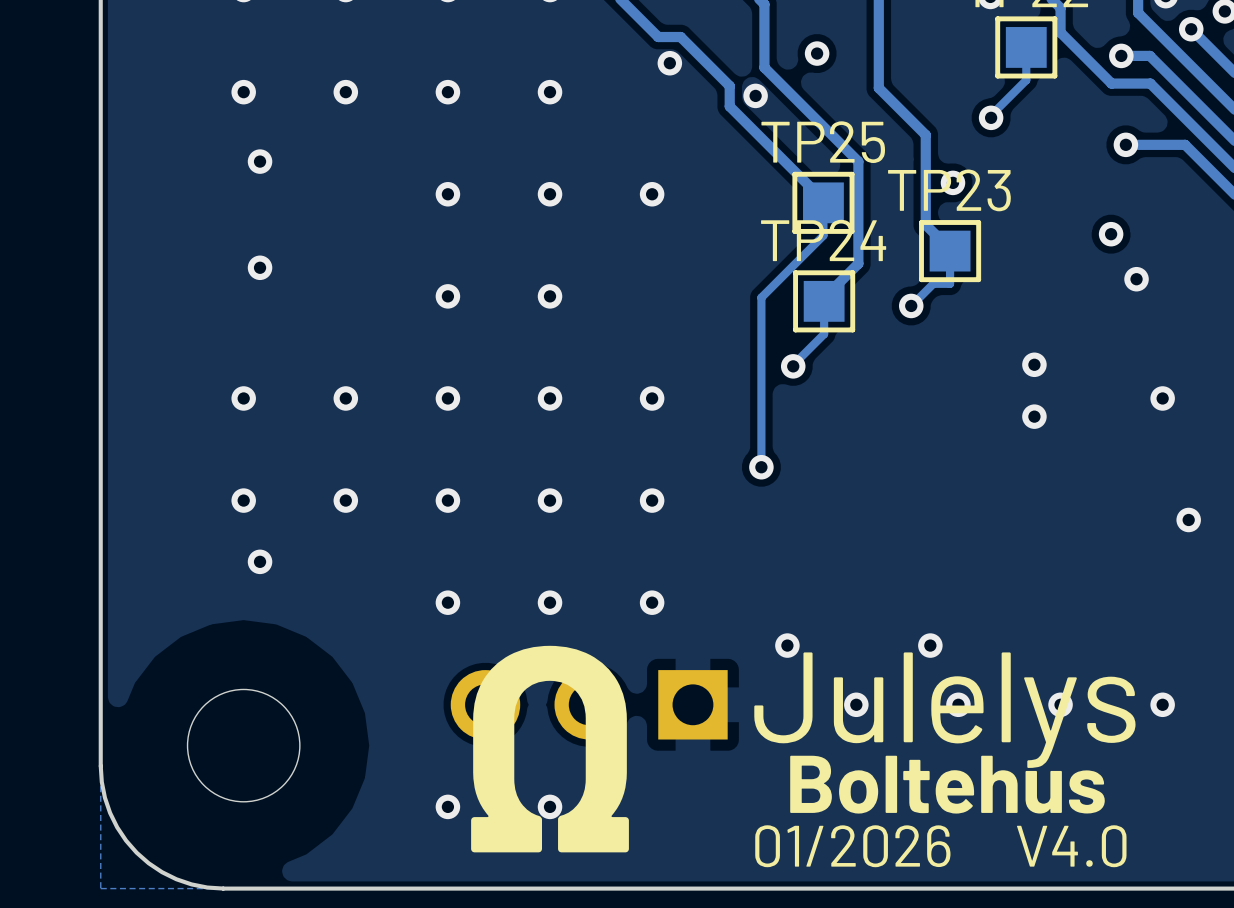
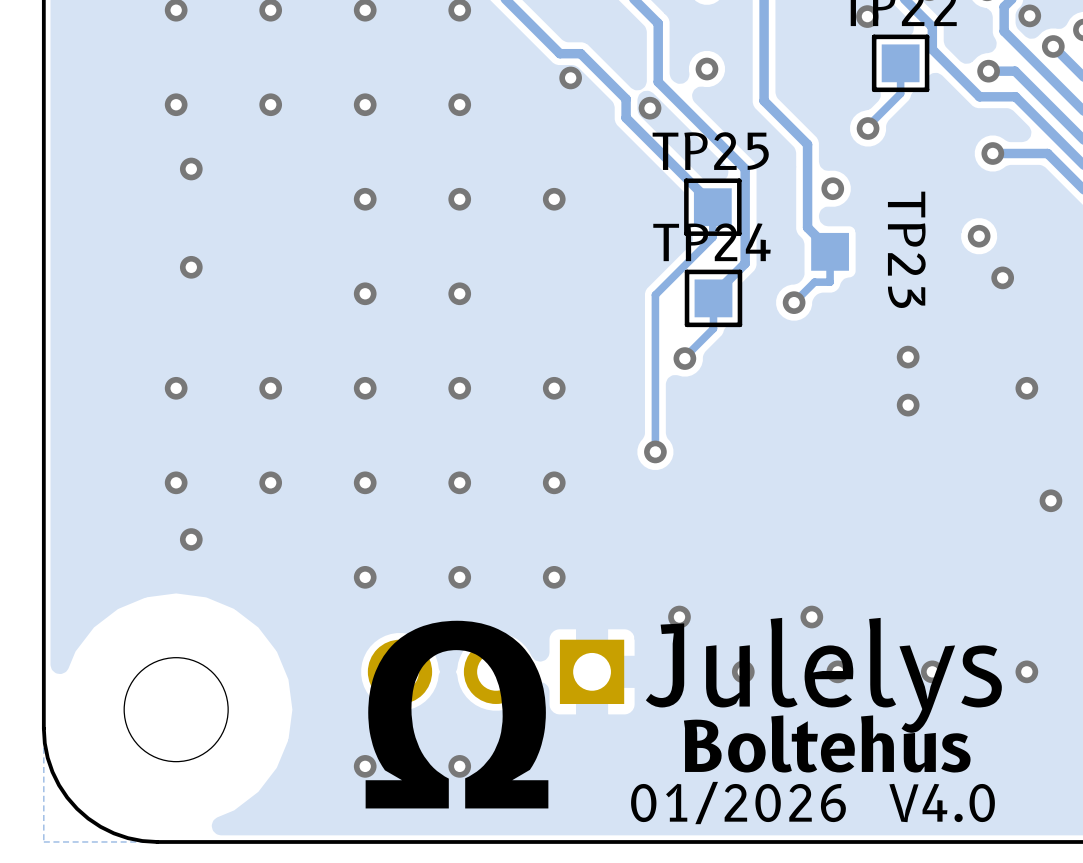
TP23 name position: TP23 (949, 190) -> TP23 (906, 249)
TP23 footprint: [919, 220, 982, 283] -> [811, 232, 849, 271]

